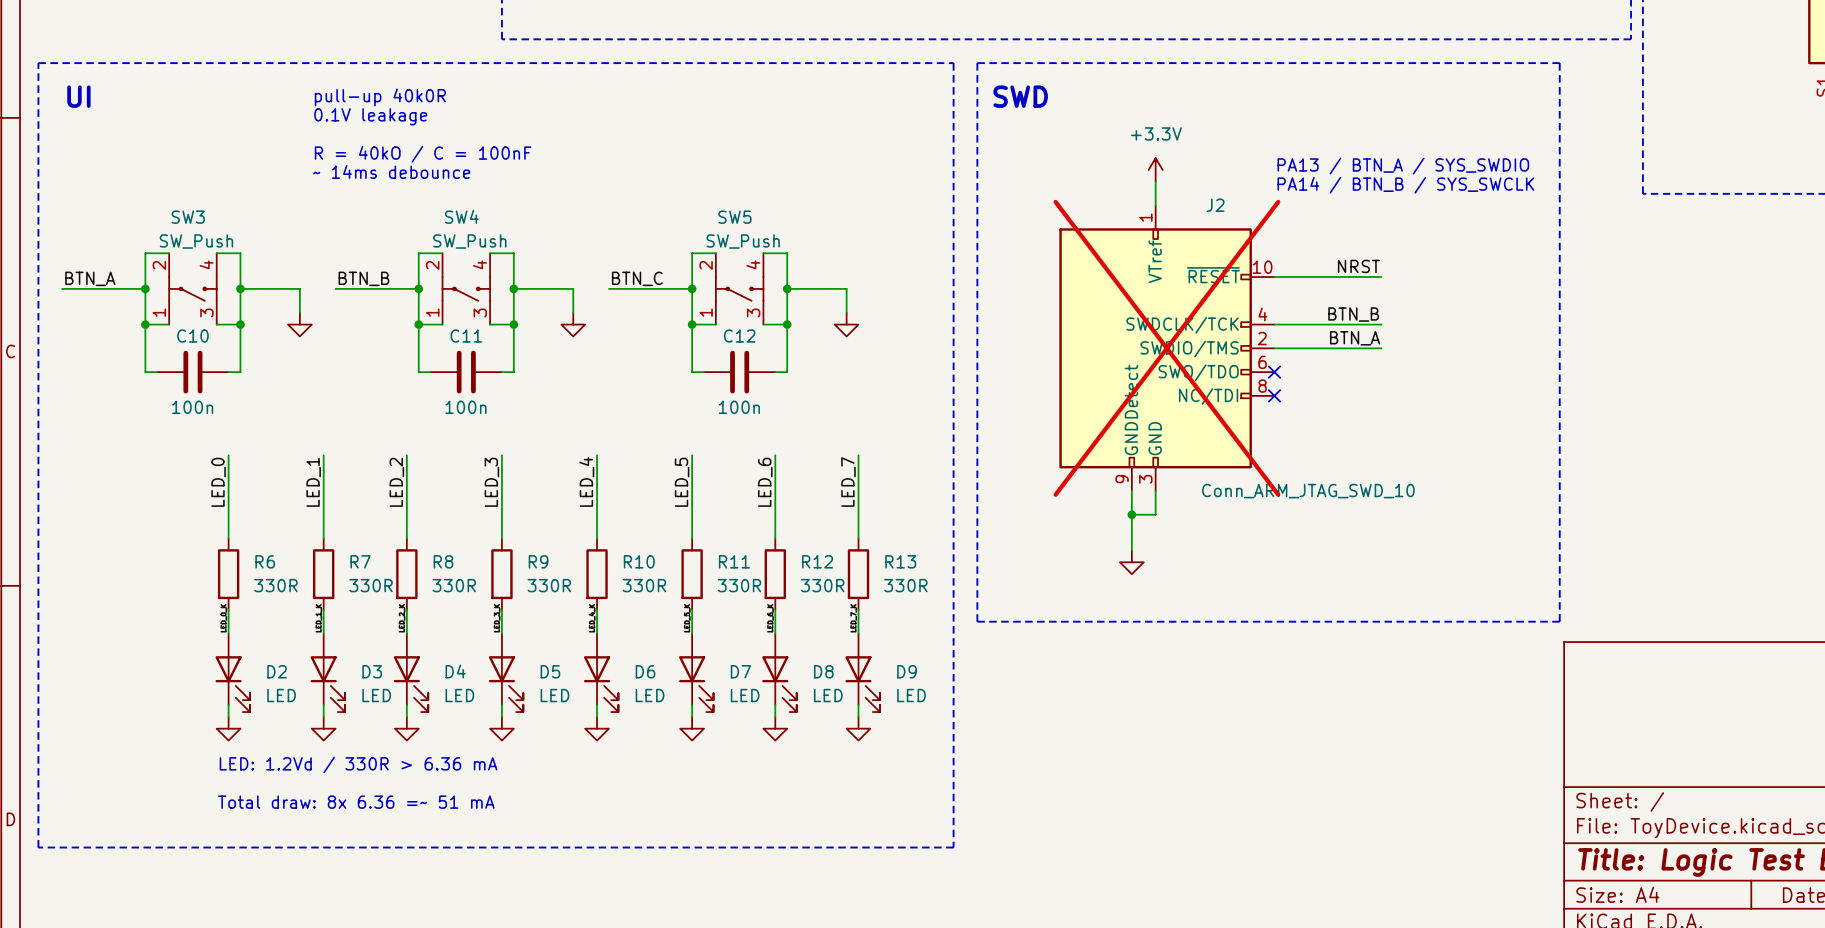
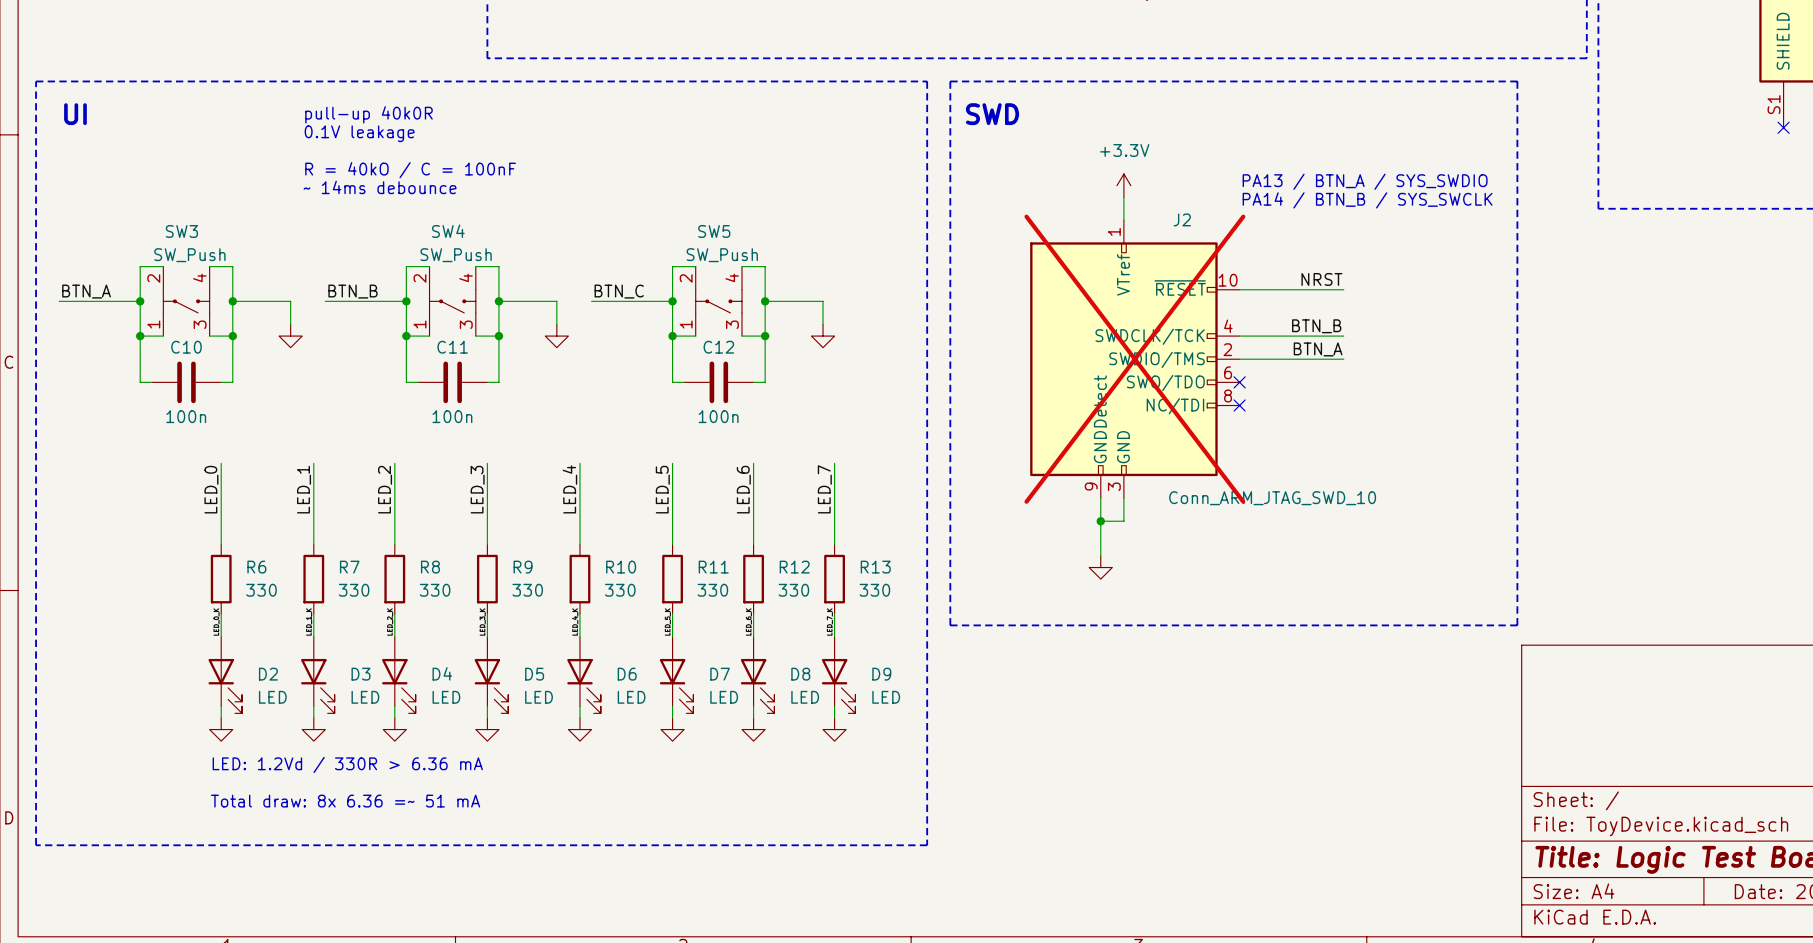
R6 value: 330R (275, 585) -> 330 (261, 590)
R7 value: 330R (371, 585) -> 330 (354, 590)
R8 value: 330R (454, 585) -> 330 (435, 590)
R9 value: 330R (549, 585) -> 330 (527, 590)
R10 value: 330R (644, 585) -> 330 (620, 590)
R11 value: 330R (739, 585) -> 330 (712, 590)
R12 value: 330R (822, 585) -> 330 (793, 590)
R13 value: 330R (905, 585) -> 330 (874, 590)

